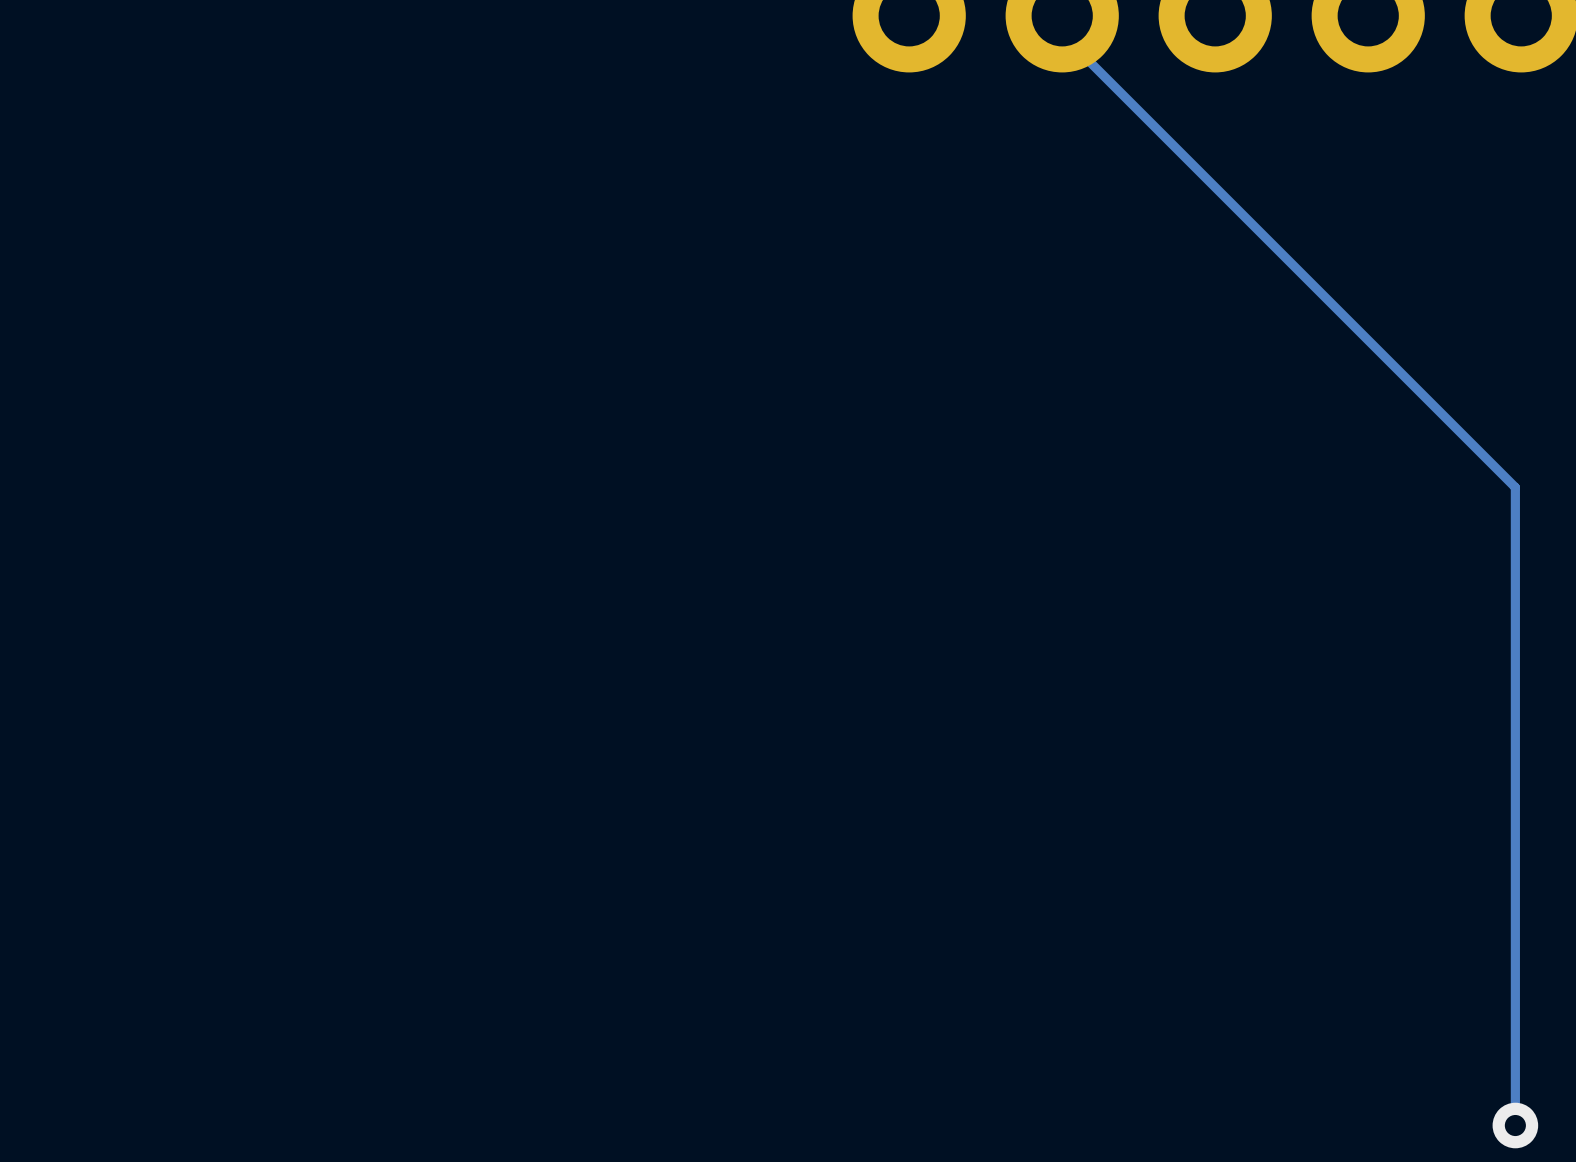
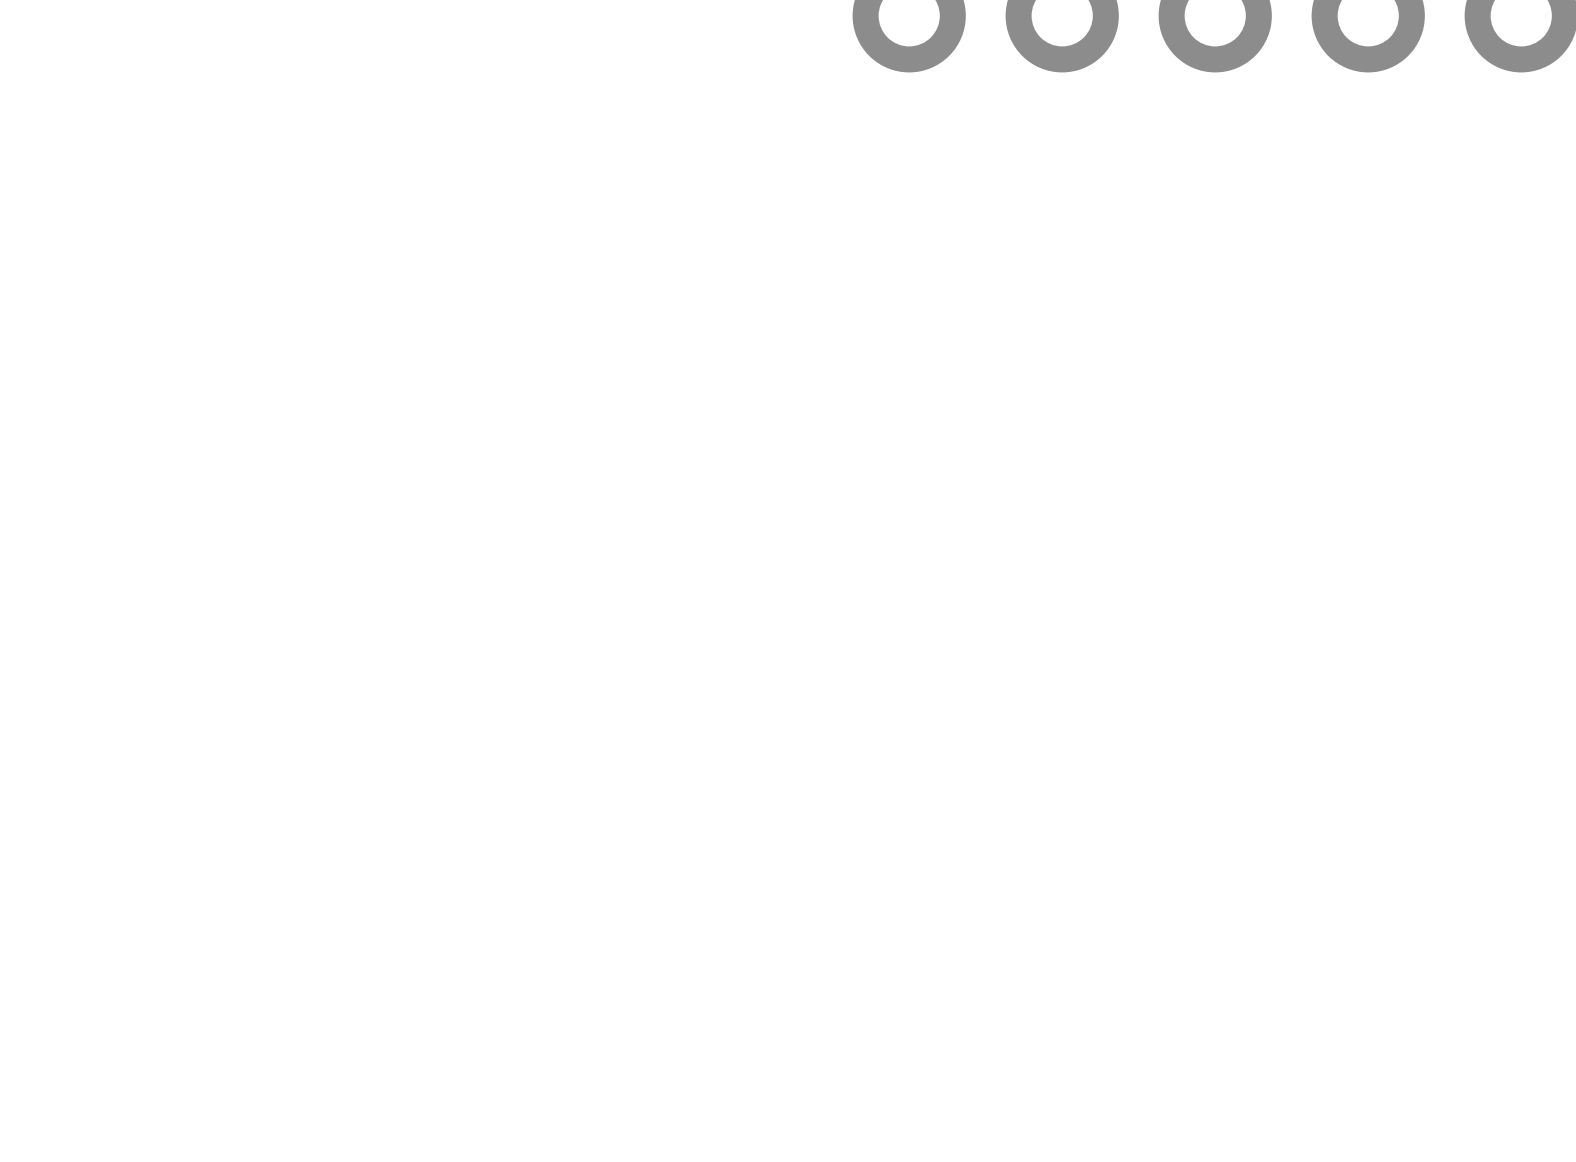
track: (1062, 15) (1065, 19) (1065, 37) (1515, 487) (1515, 1125) -> none
via: (1515, 1125) -> none

